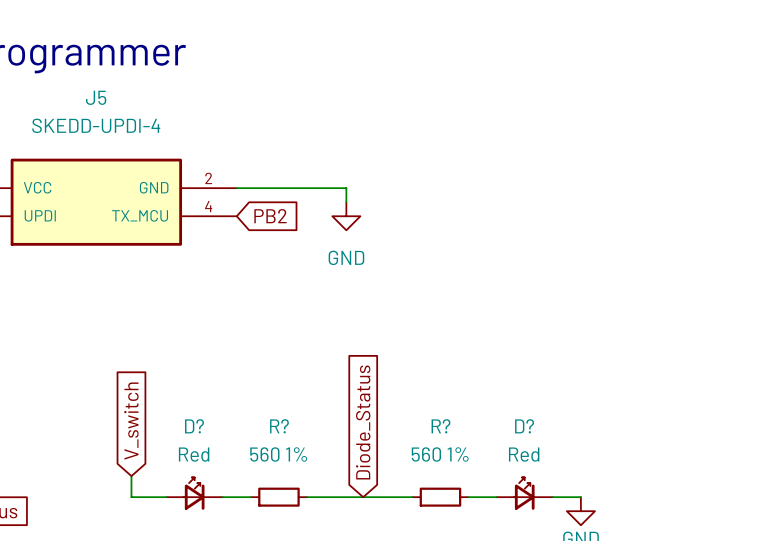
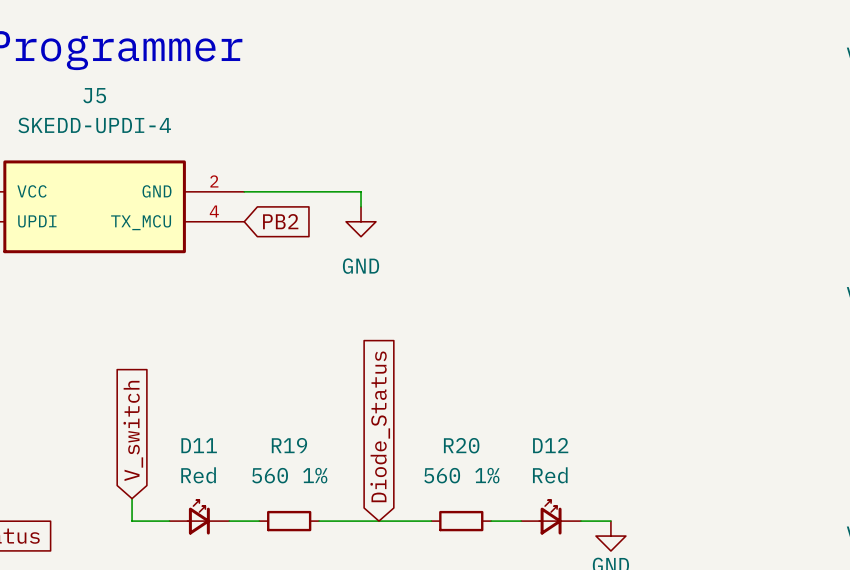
D? name: D? (194, 426) -> D11 (199, 445)
R? name: R? (279, 426) -> R19 (289, 445)
R? name: R? (440, 426) -> R20 (461, 445)
D? name: D? (524, 426) -> D12 (550, 445)

